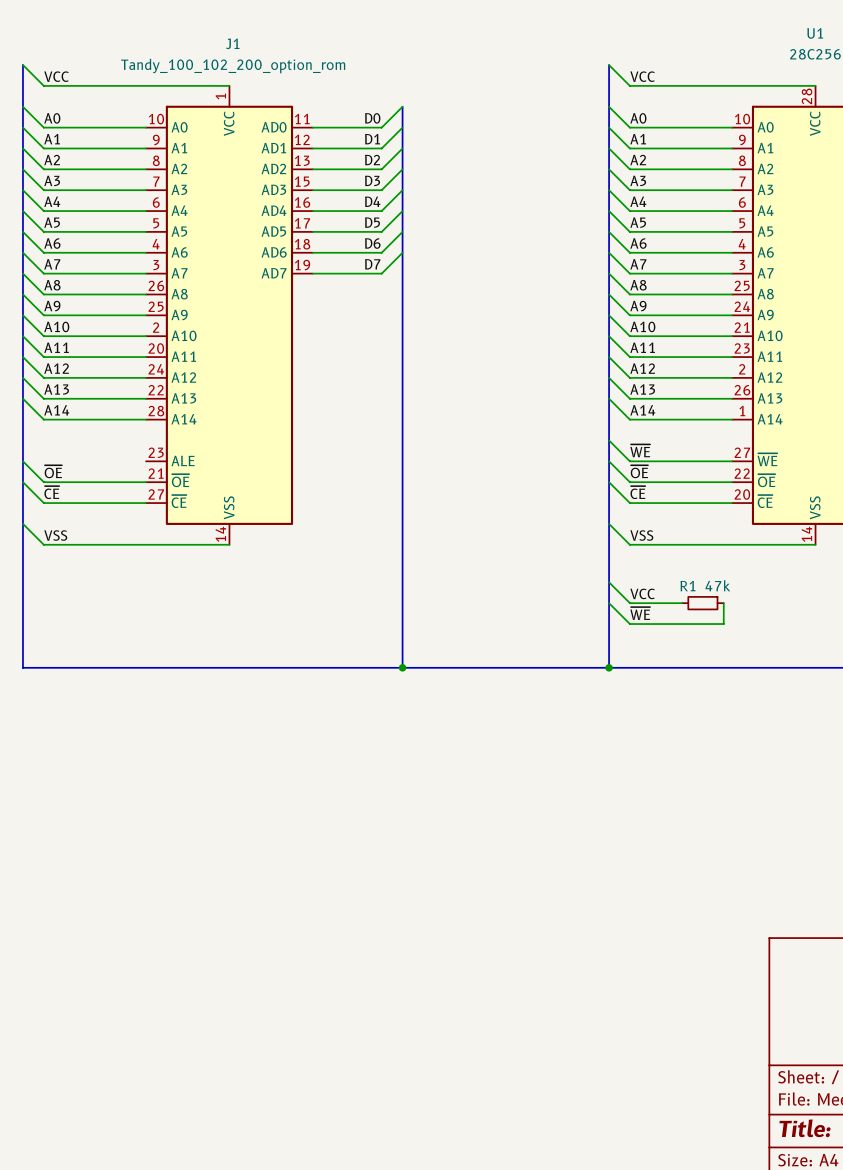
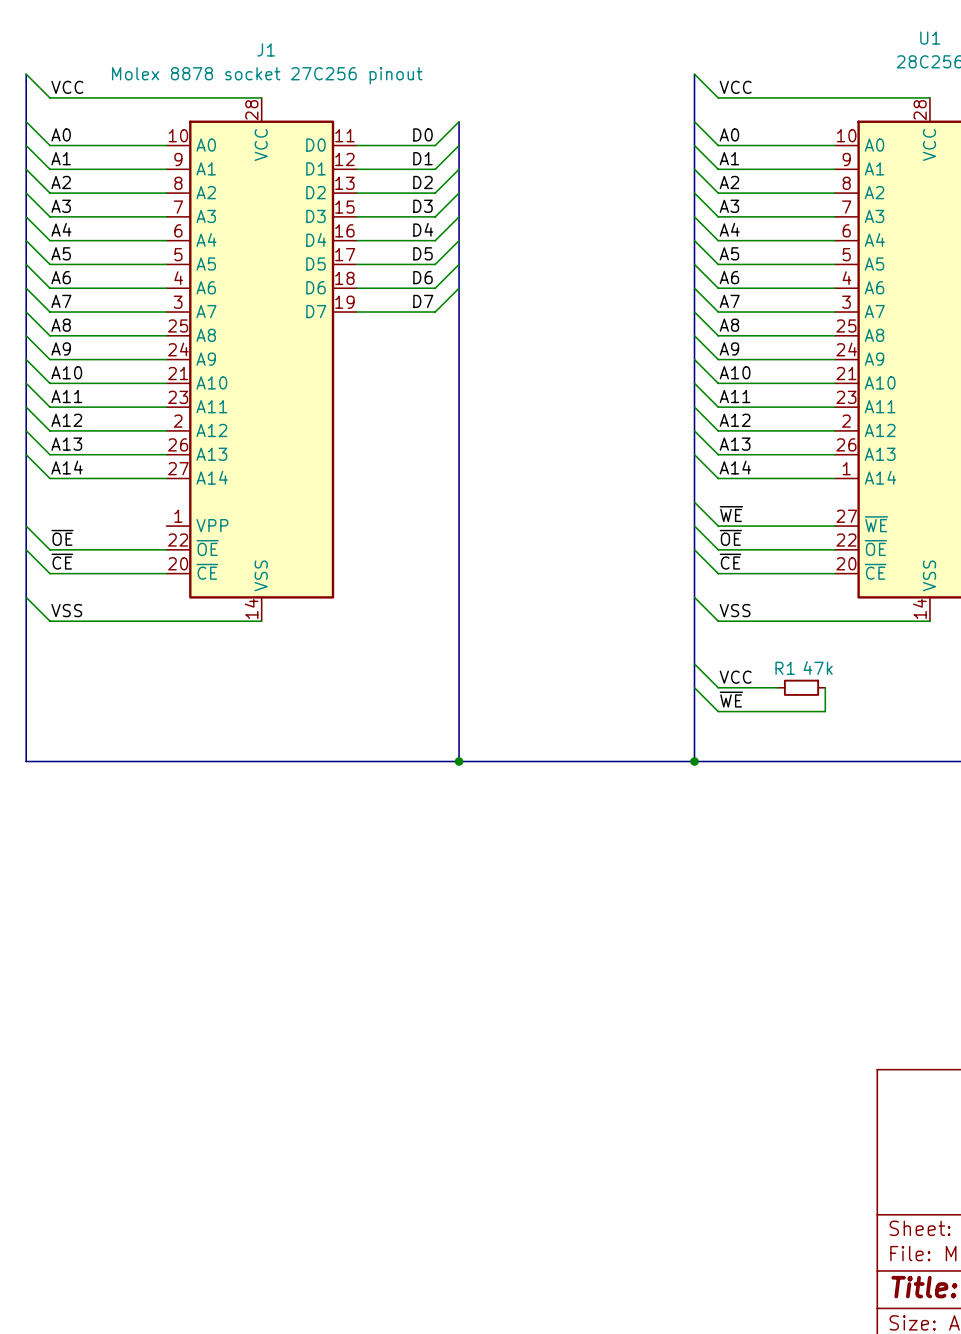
J1 value: Tandy_100_102_200_option_rom (233, 66) -> Molex 8878 socket 27C256 pinout (267, 75)
J1 symbol: [146, 85, 313, 545] -> [166, 97, 357, 622]

